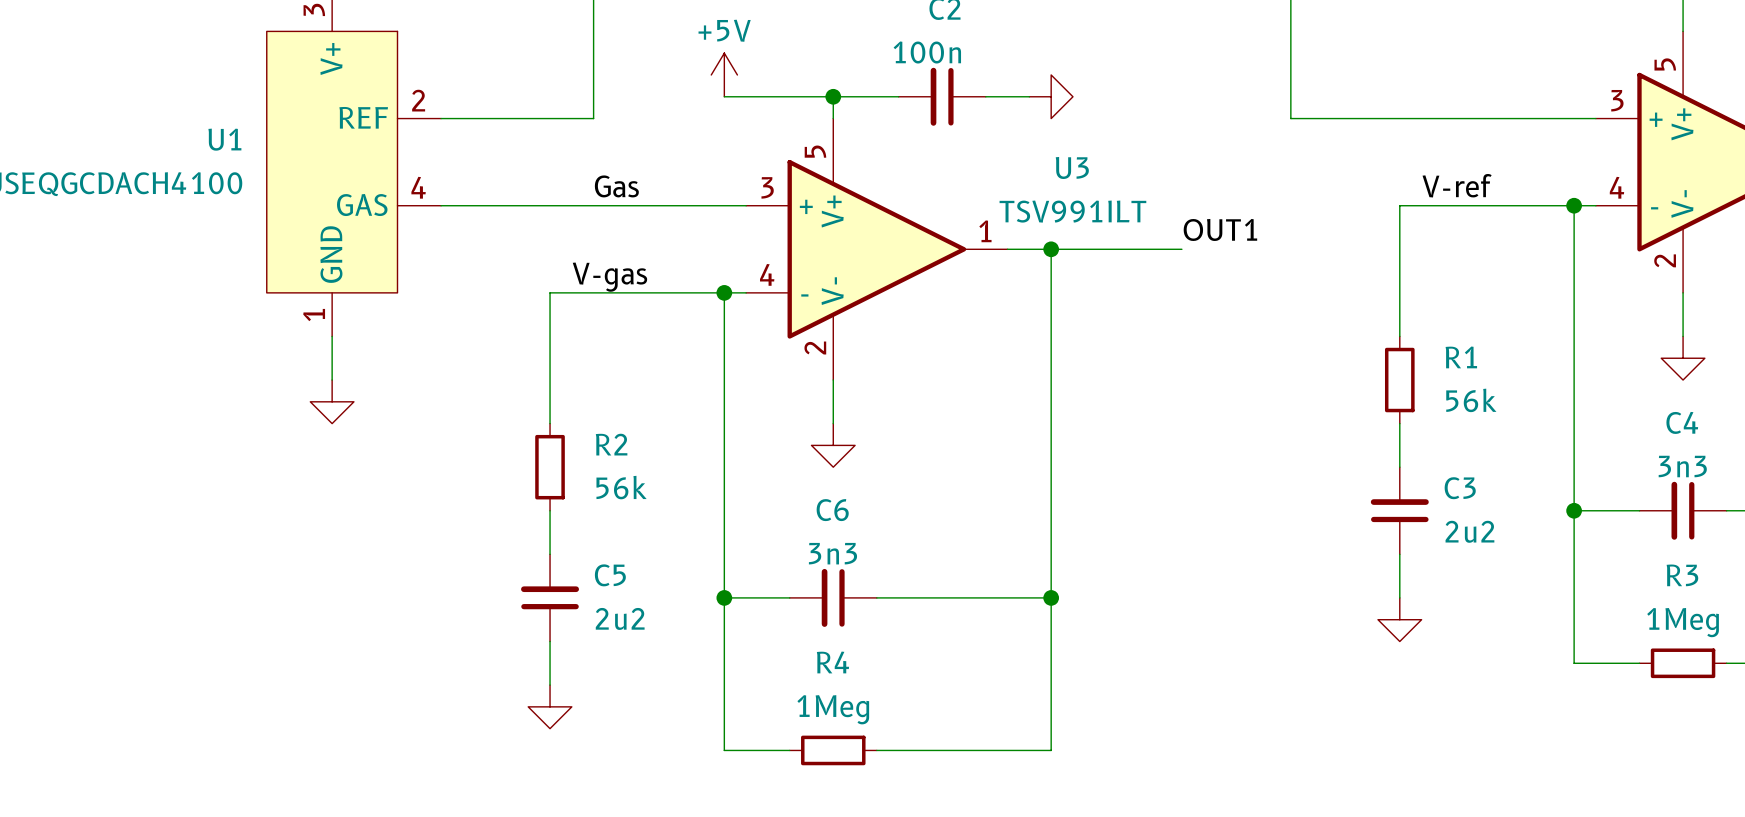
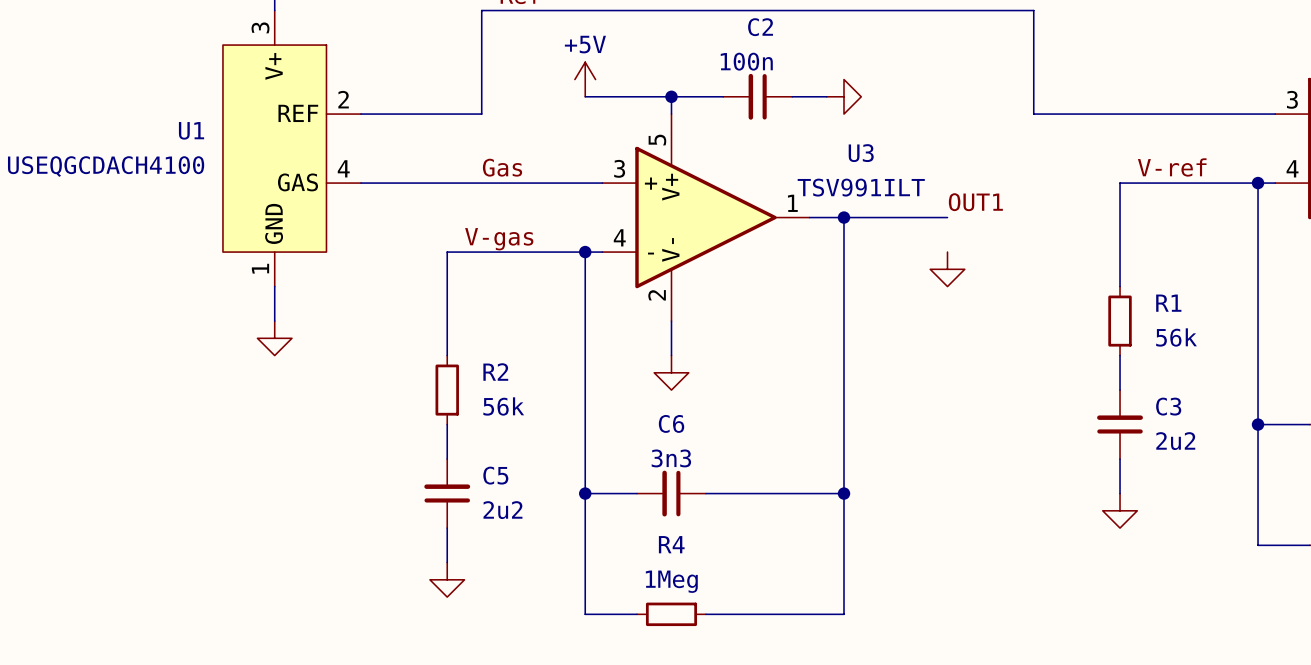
power symbol: none -> (947, 269)

